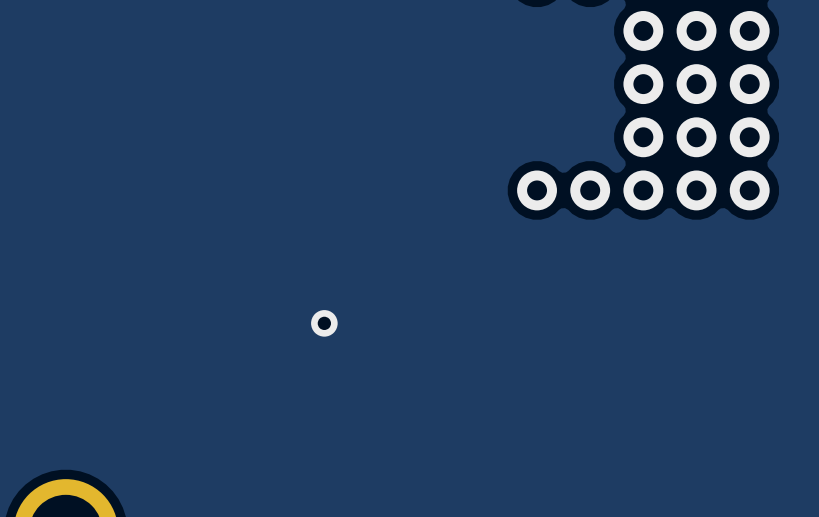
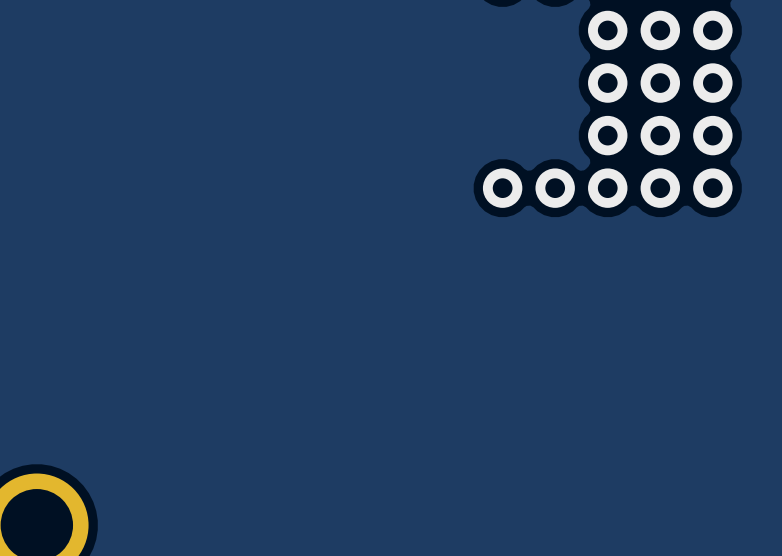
via: (324, 323) -> none

